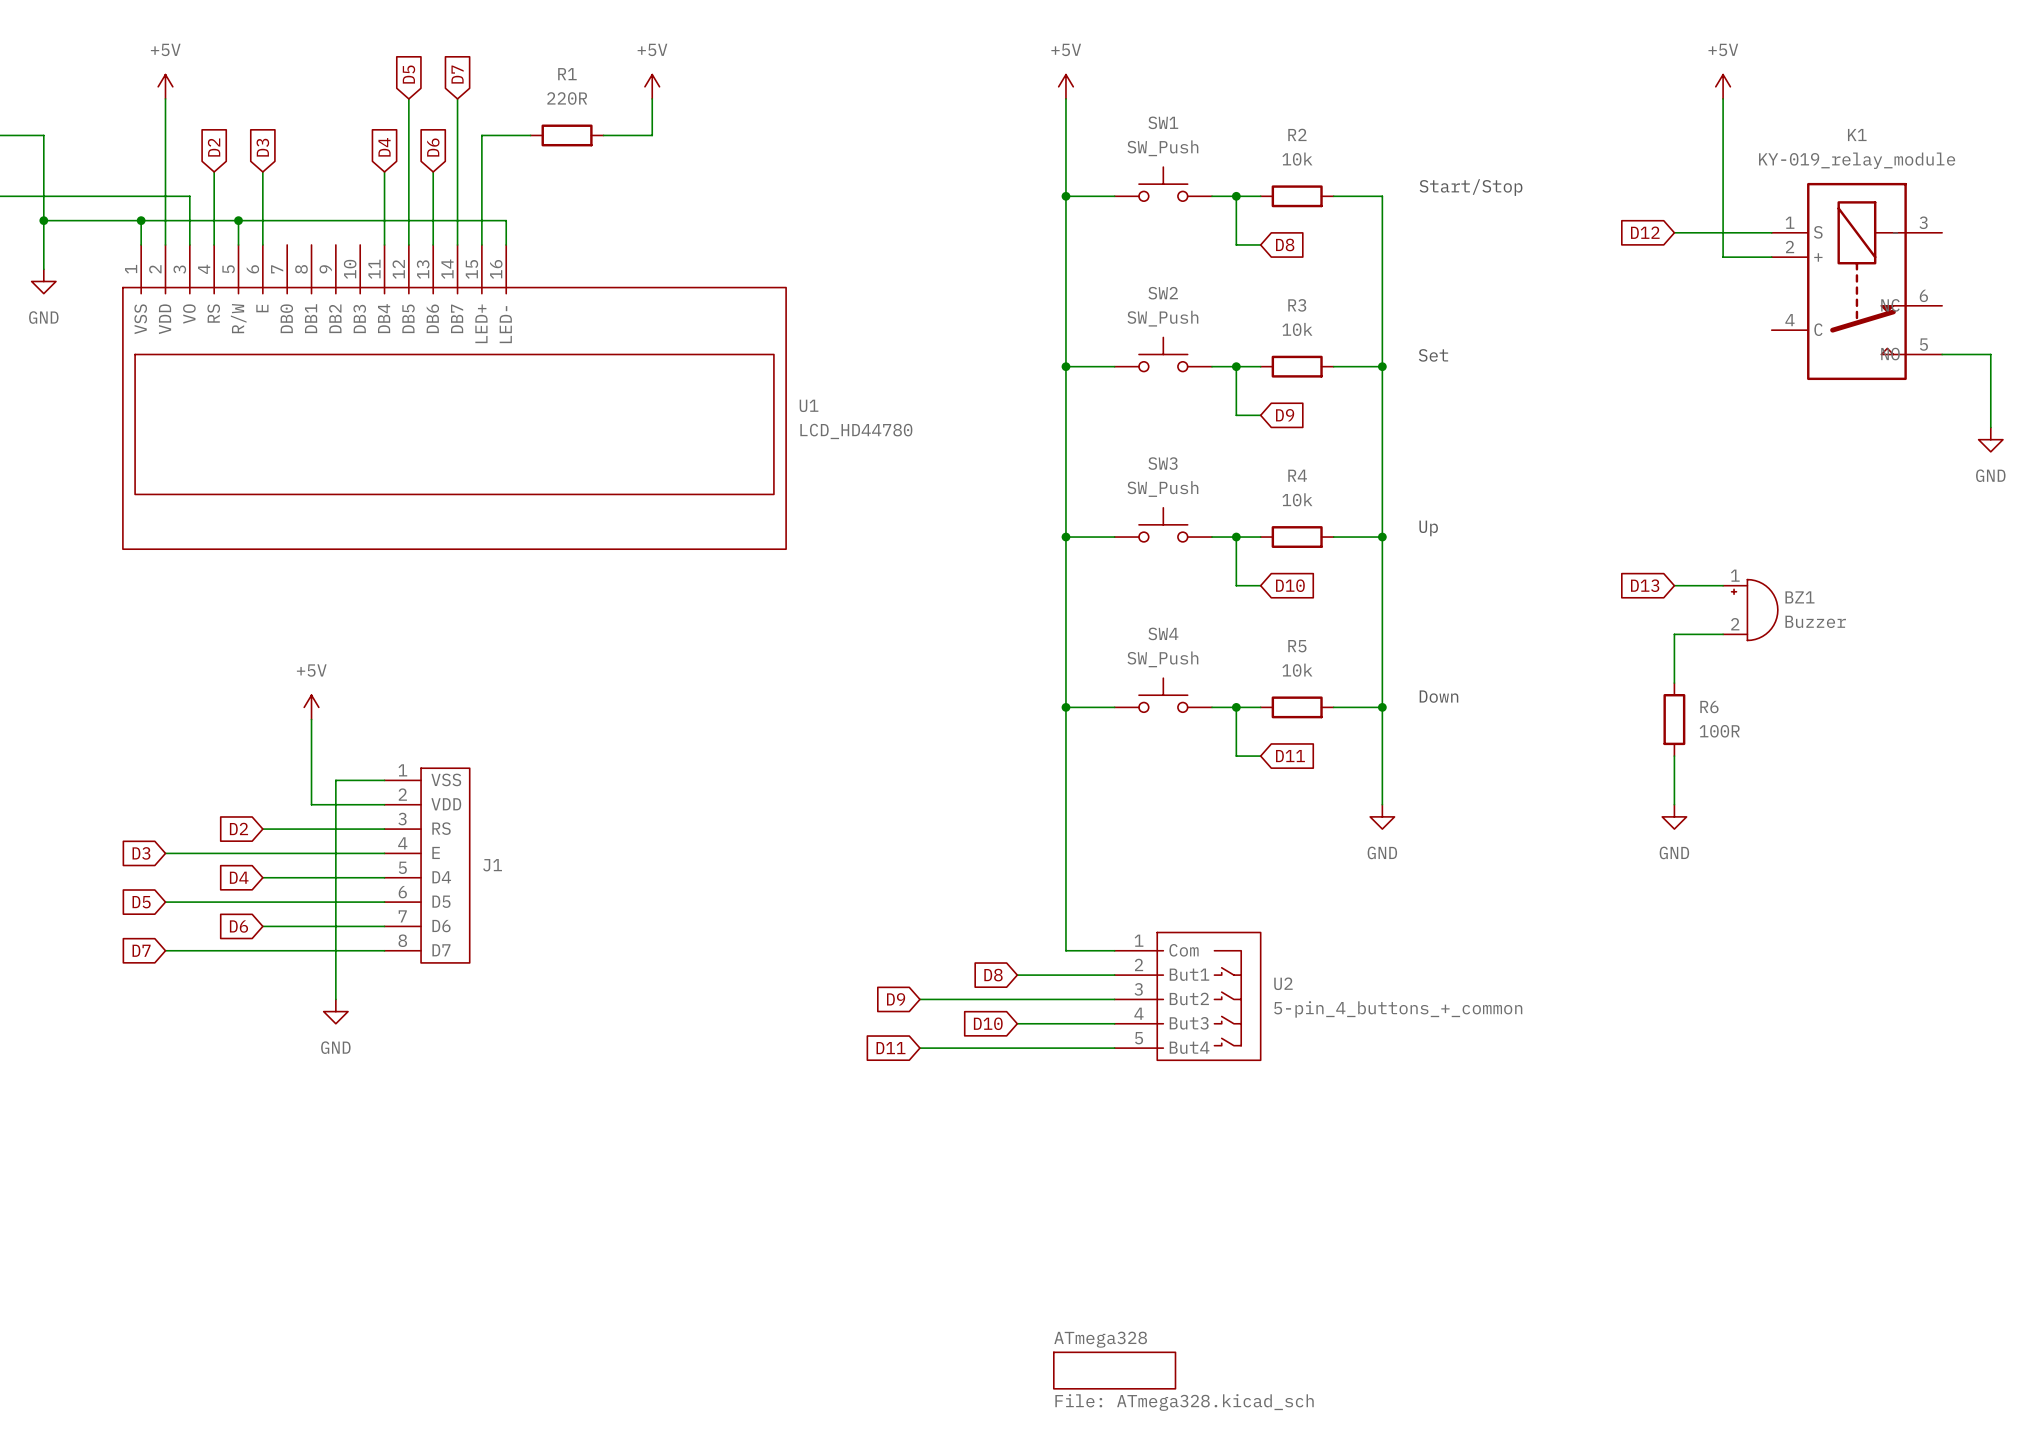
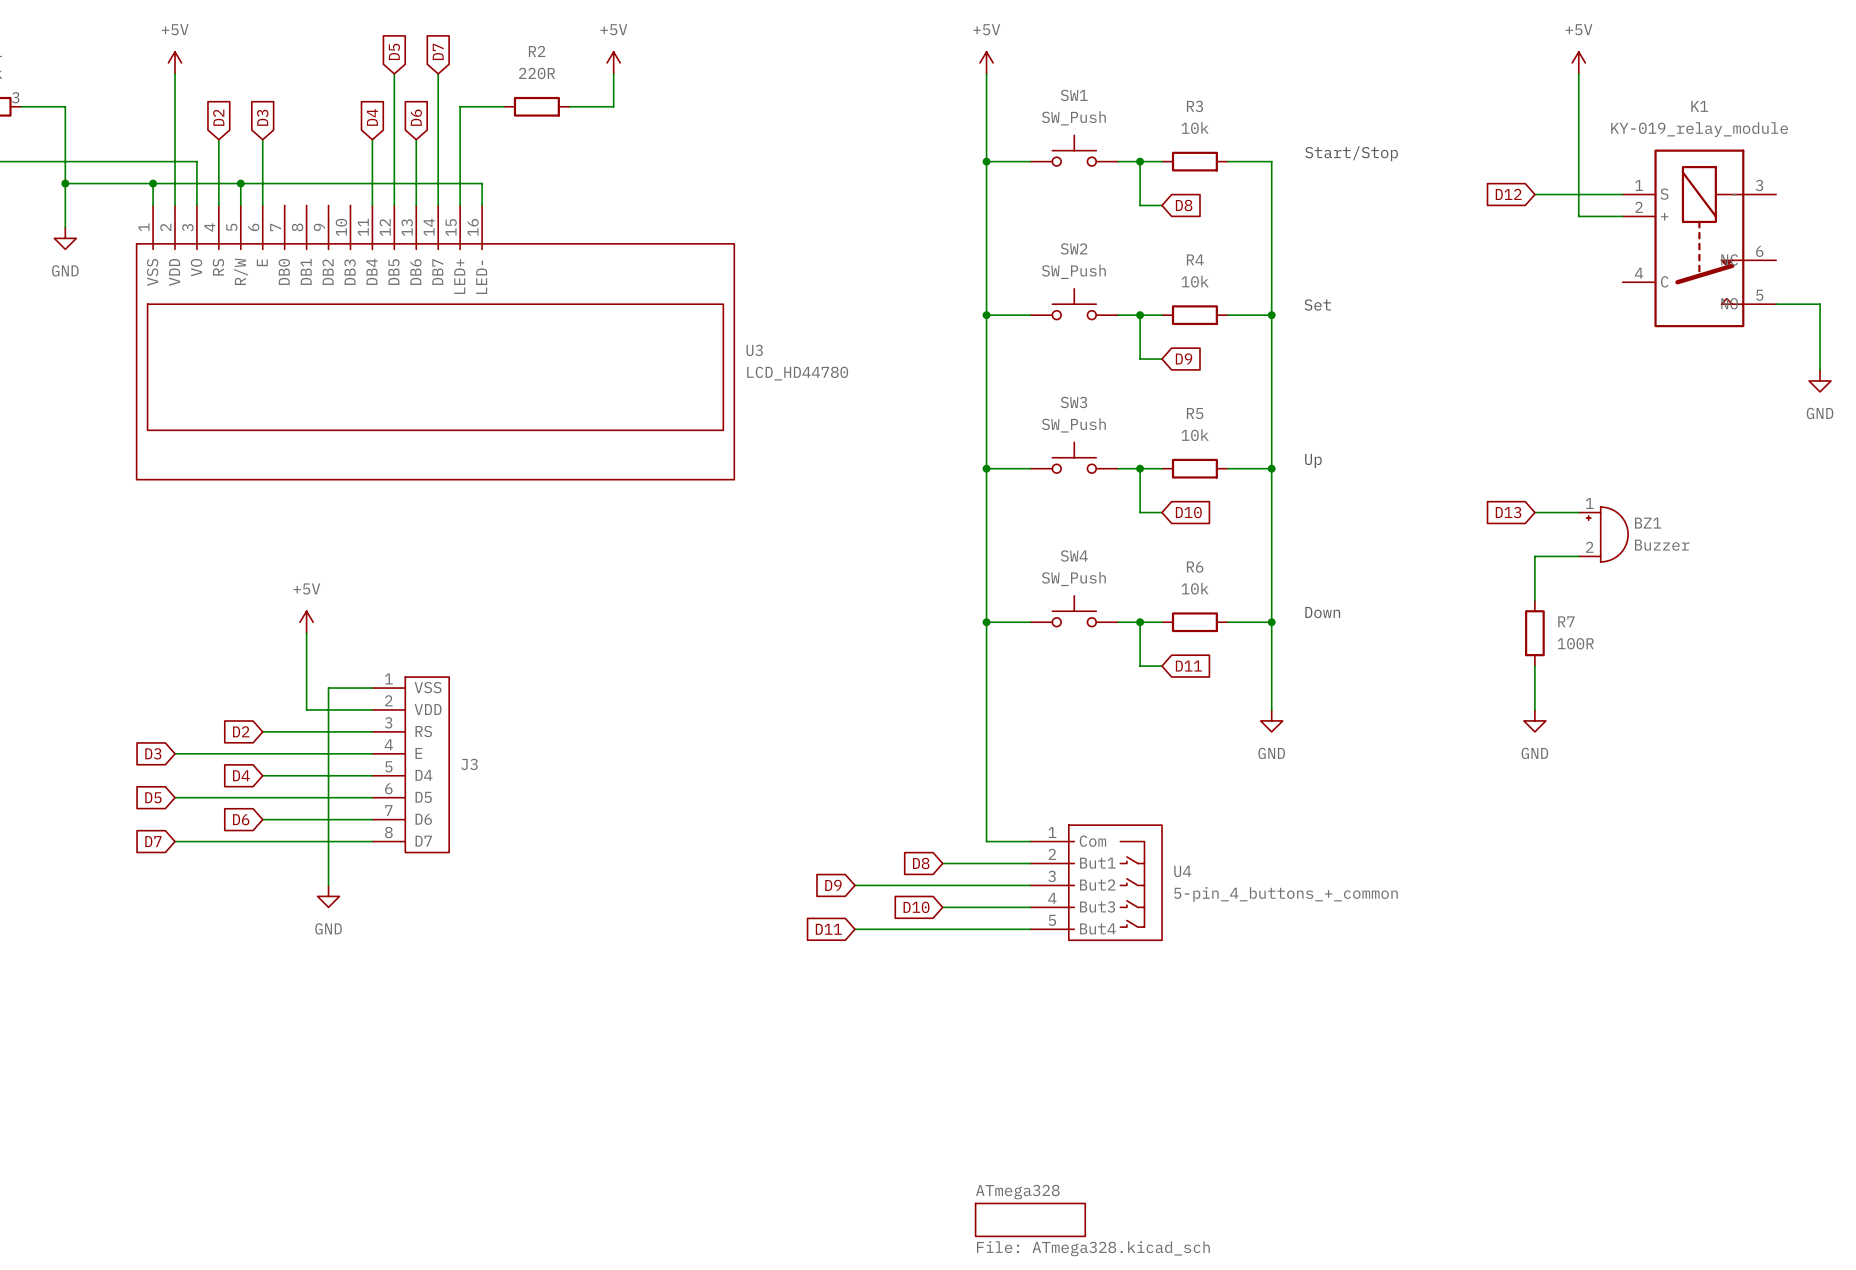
R1 name: R1 (567, 74) -> R2 (537, 51)
R2 name: R2 (1297, 134) -> R3 (1194, 106)
R3 name: R3 (1297, 305) -> R4 (1195, 259)
U1 name: U1 (809, 405) -> U3 (754, 350)
R4 name: R4 (1297, 475) -> R5 (1195, 413)
R5 name: R5 (1297, 646) -> R6 (1195, 567)
R6 name: R6 (1709, 707) -> R7 (1566, 621)
J1 name: J1 (492, 865) -> J3 (469, 764)
U2 name: U2 (1283, 983) -> U4 (1182, 871)

